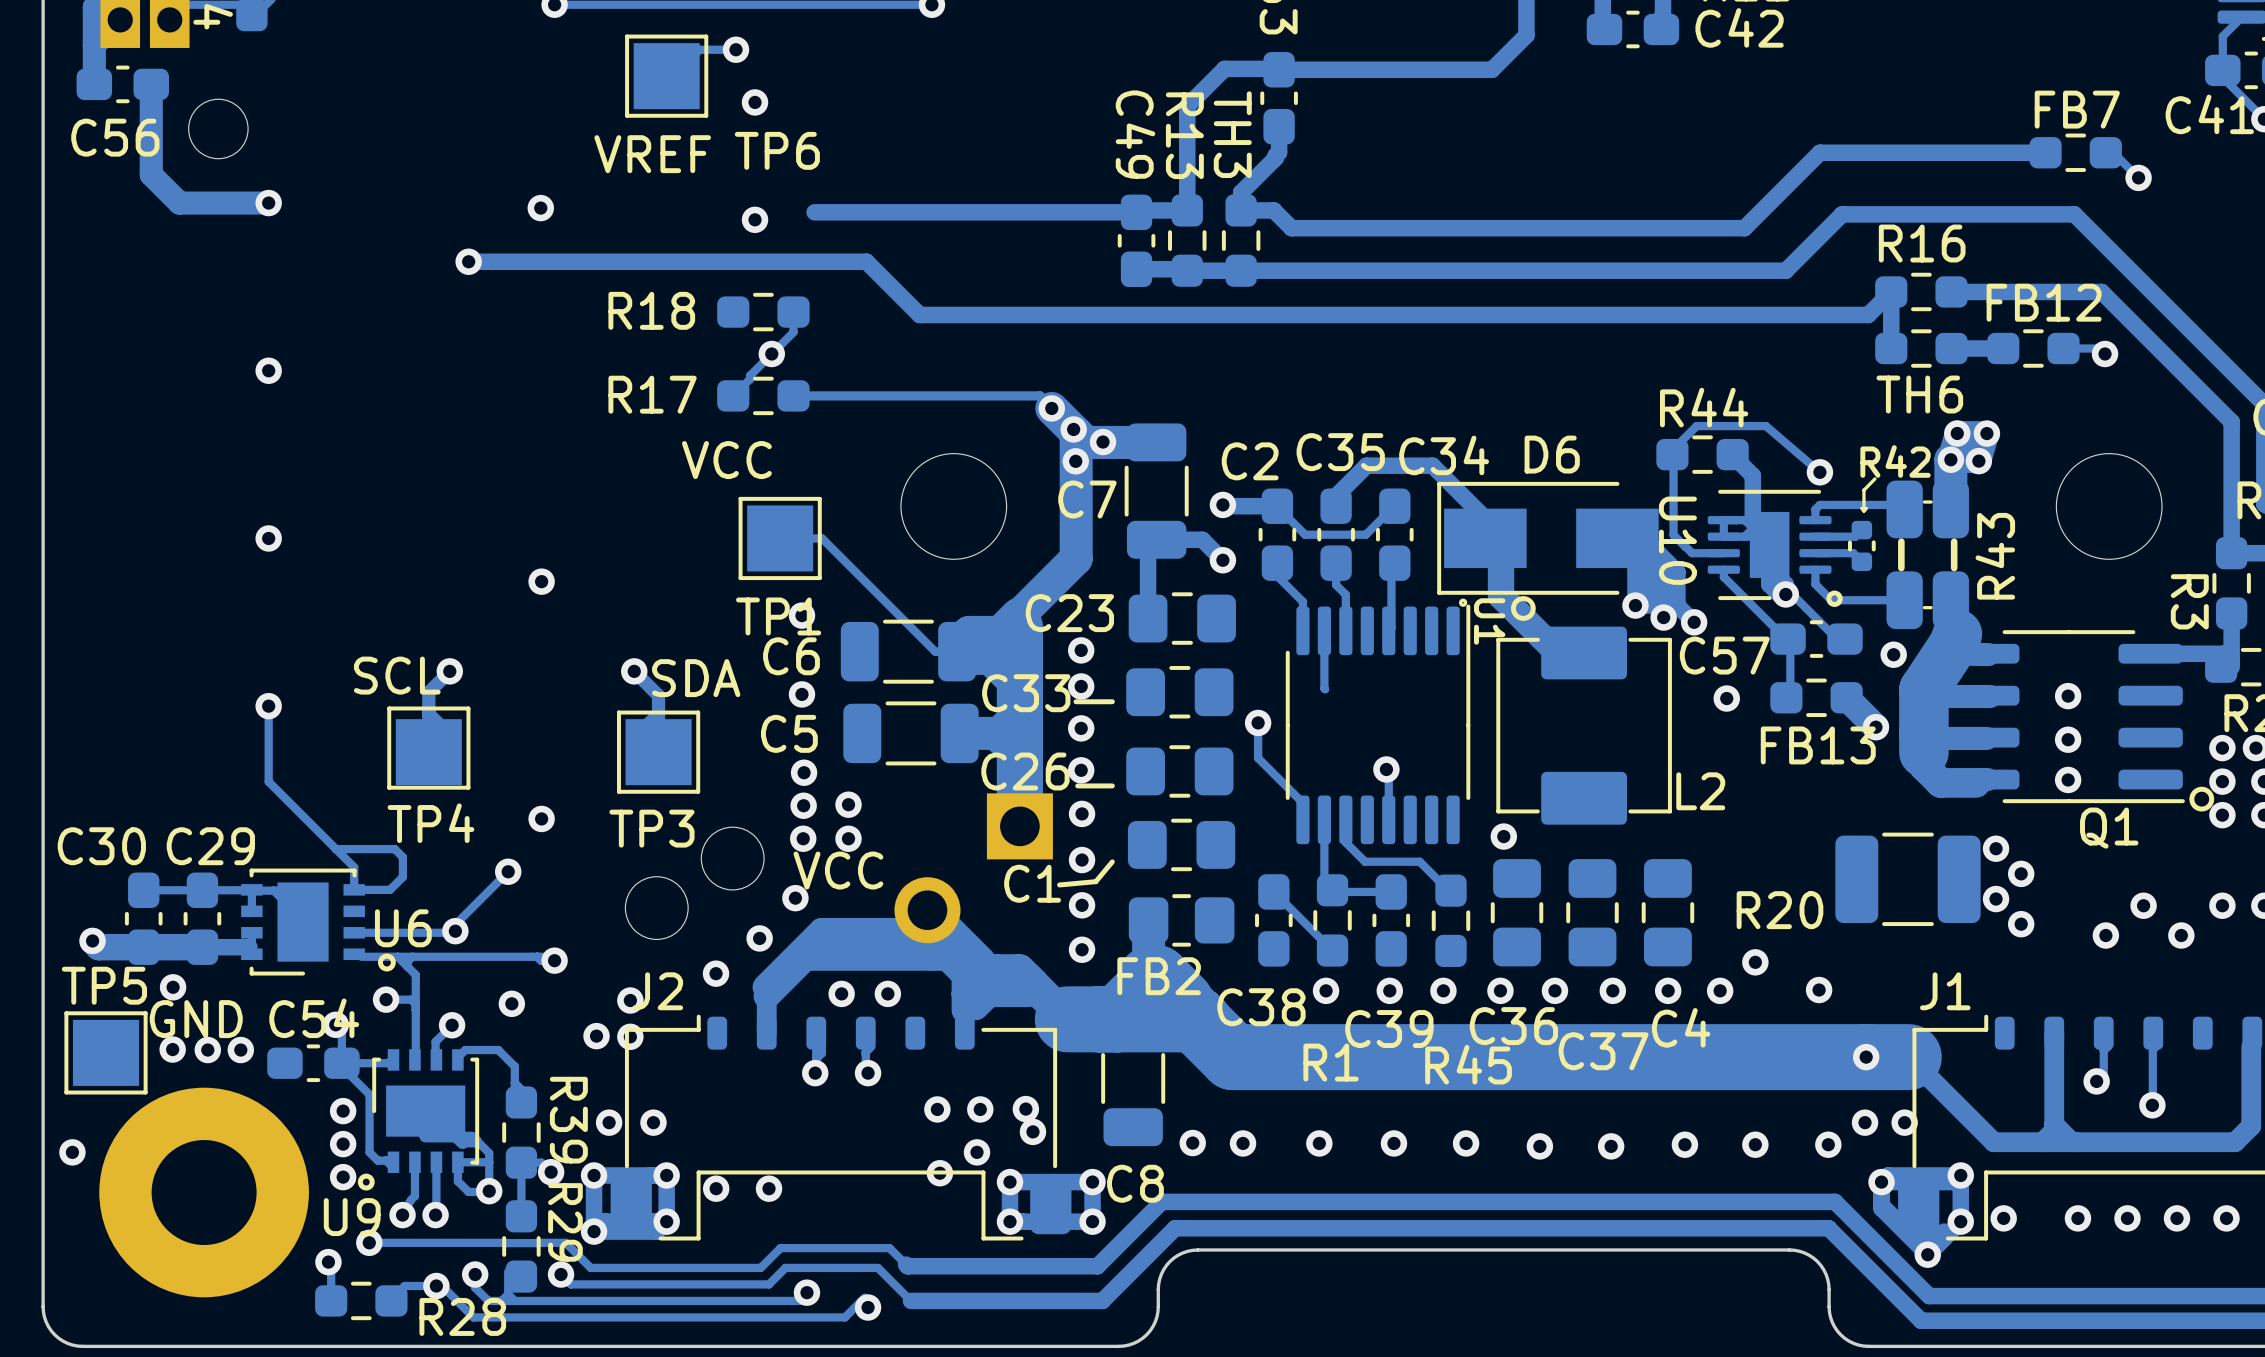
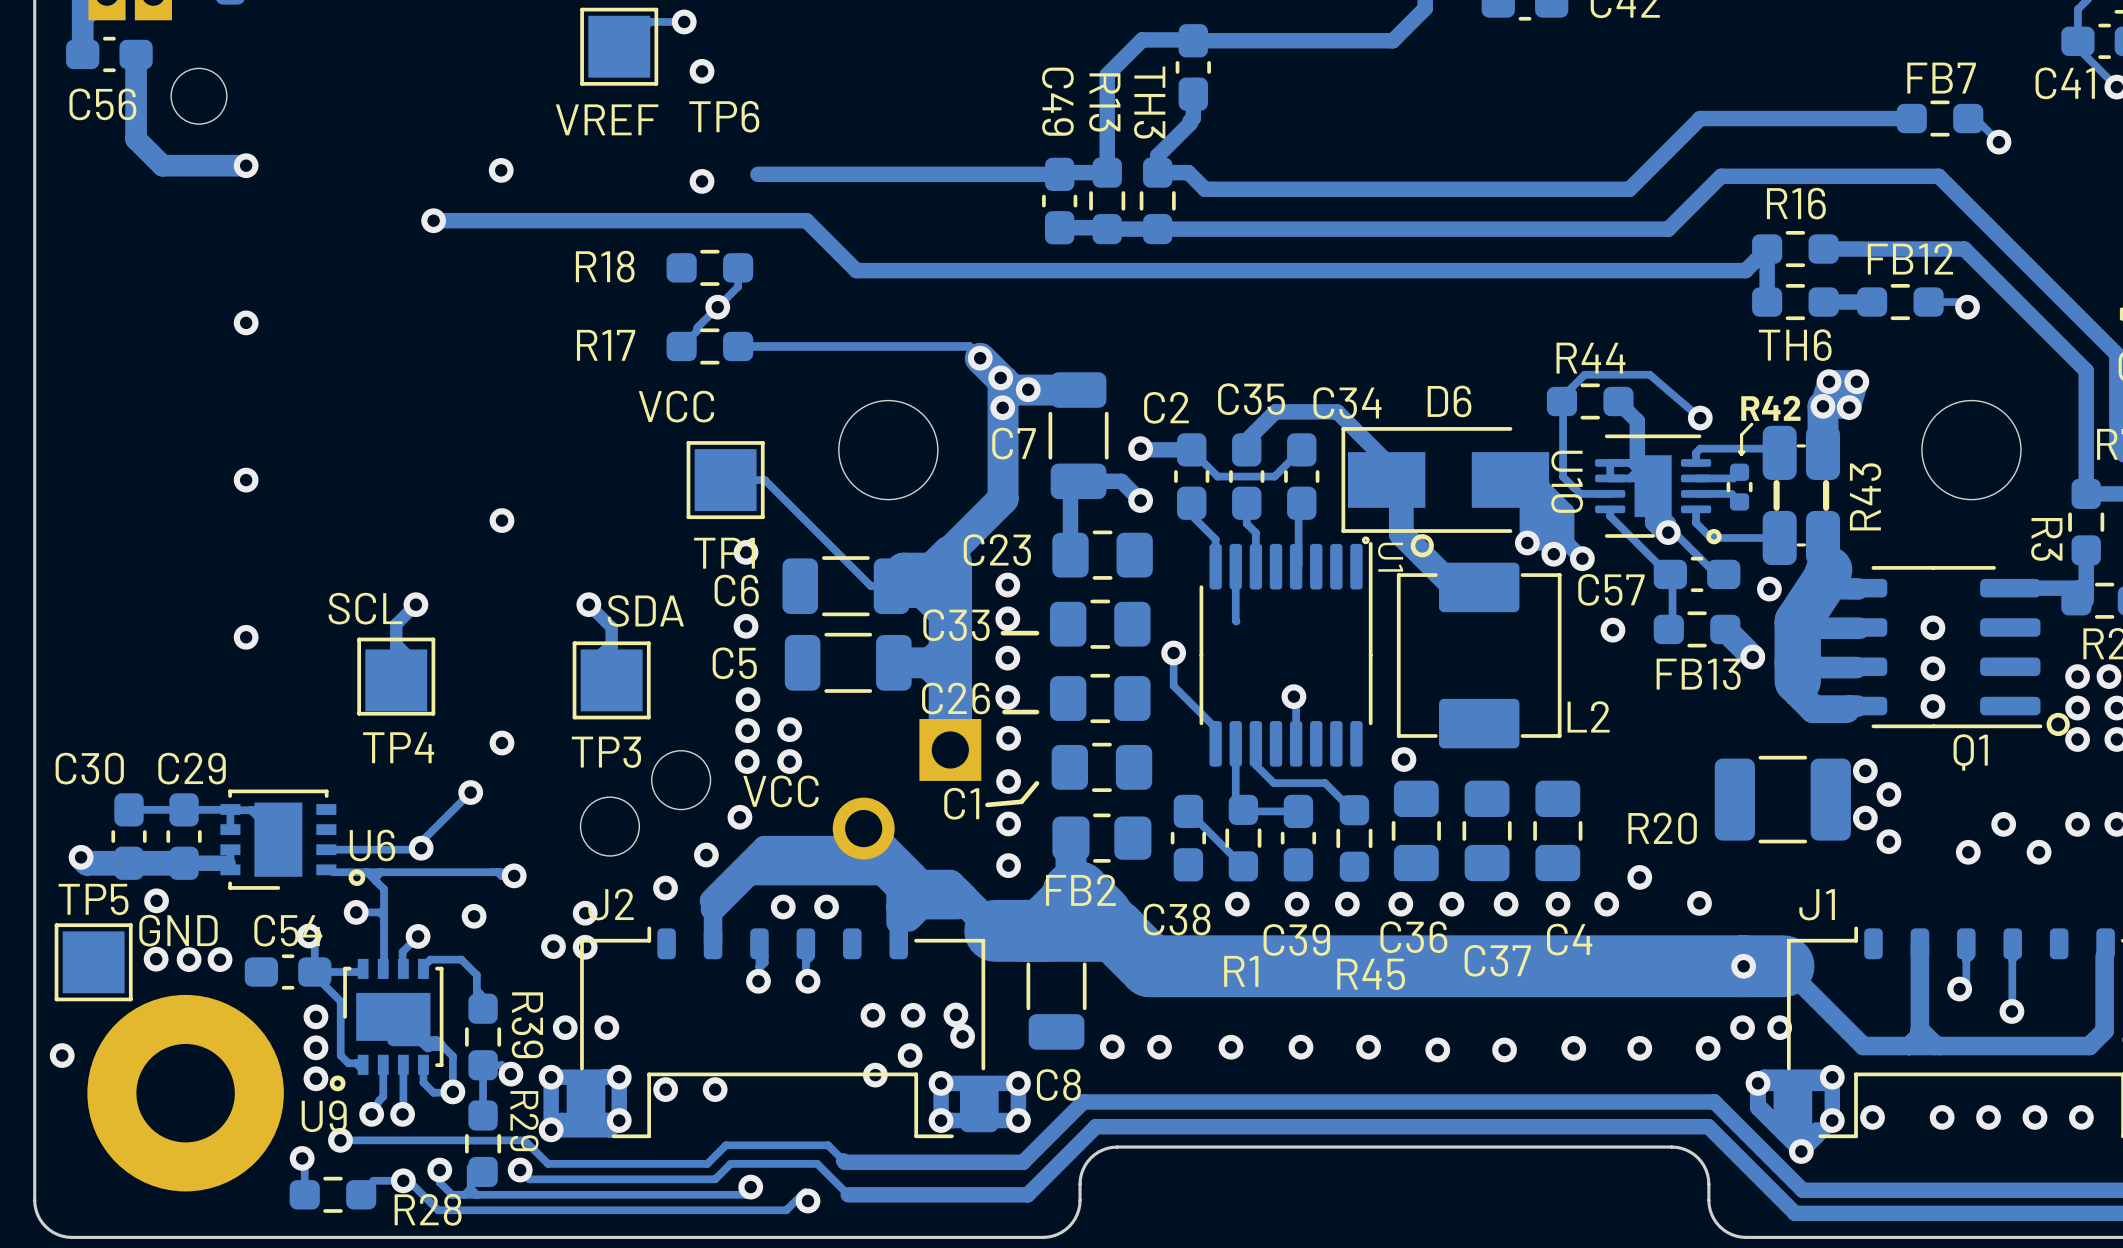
track: (268, 706) (268, 781) (354, 867) (354, 889) (390, 889) (402, 877) (402, 857) (394, 849) (336, 849) -> none
track: (488, 1162) (457, 1162) -> none

